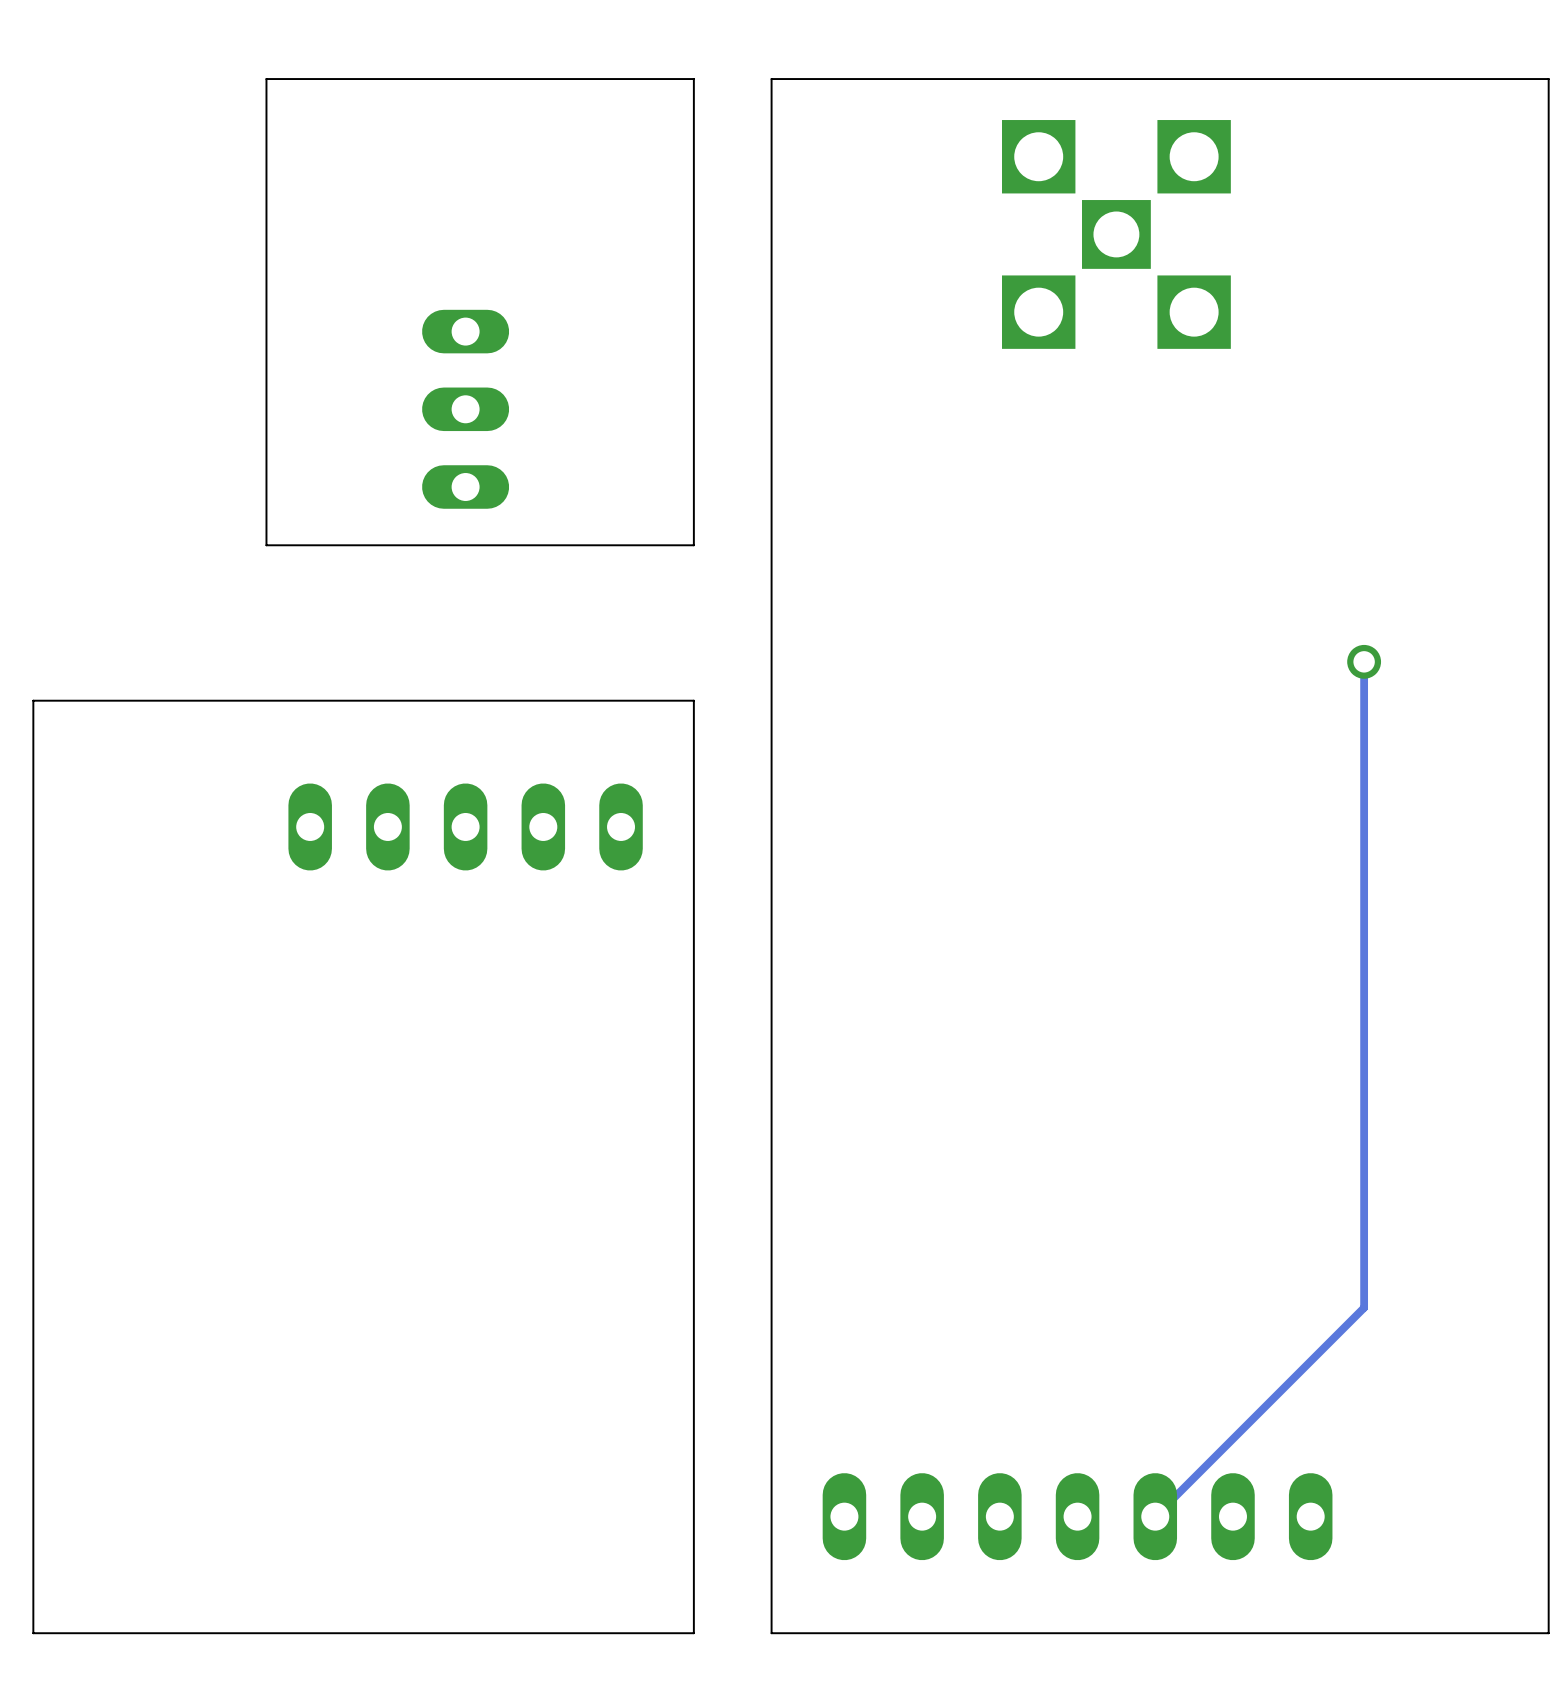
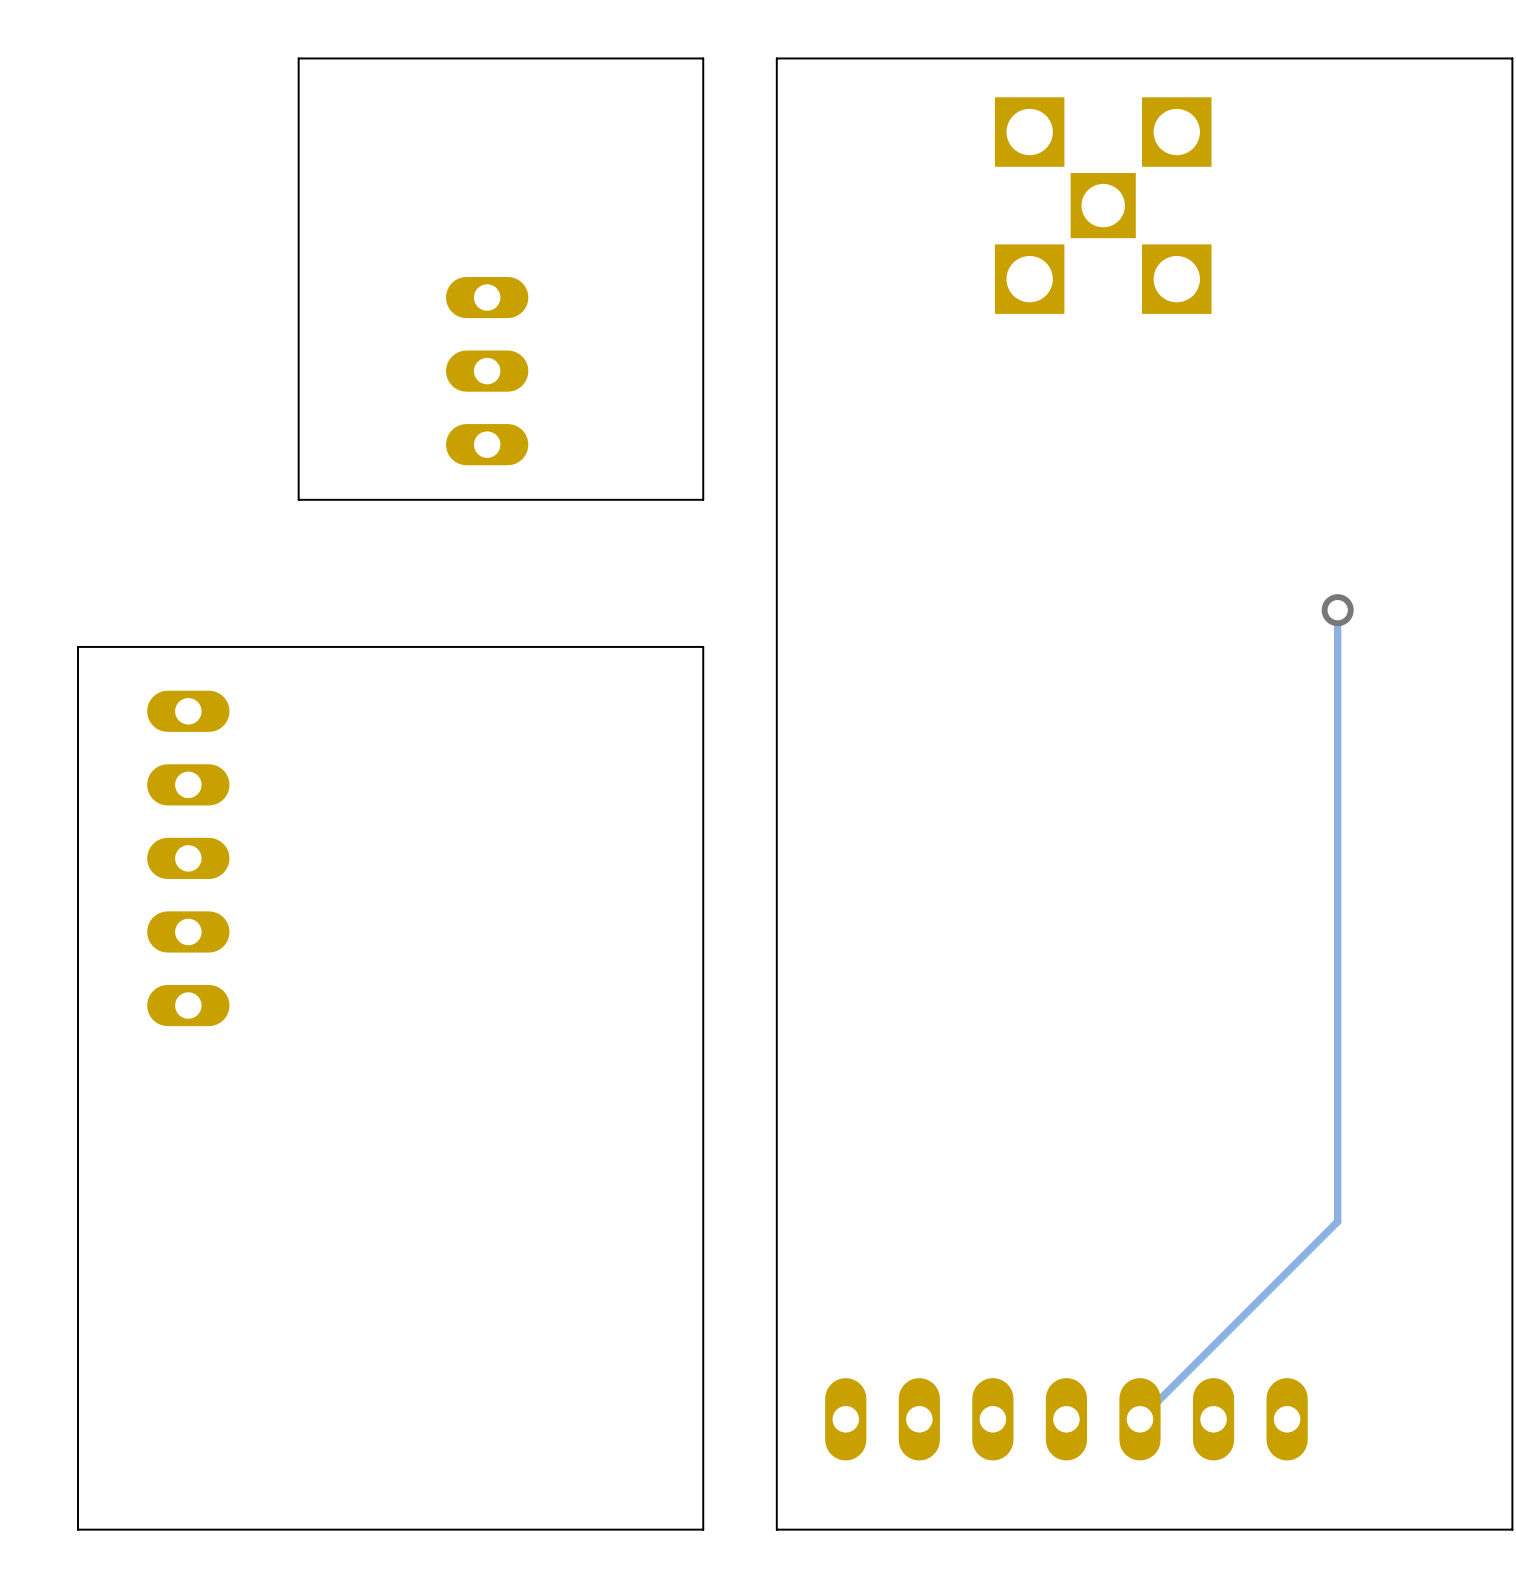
part rotation: 0° (465, 826) -> 90° clockwise (188, 858)
part position: (465, 826) -> (188, 858)

